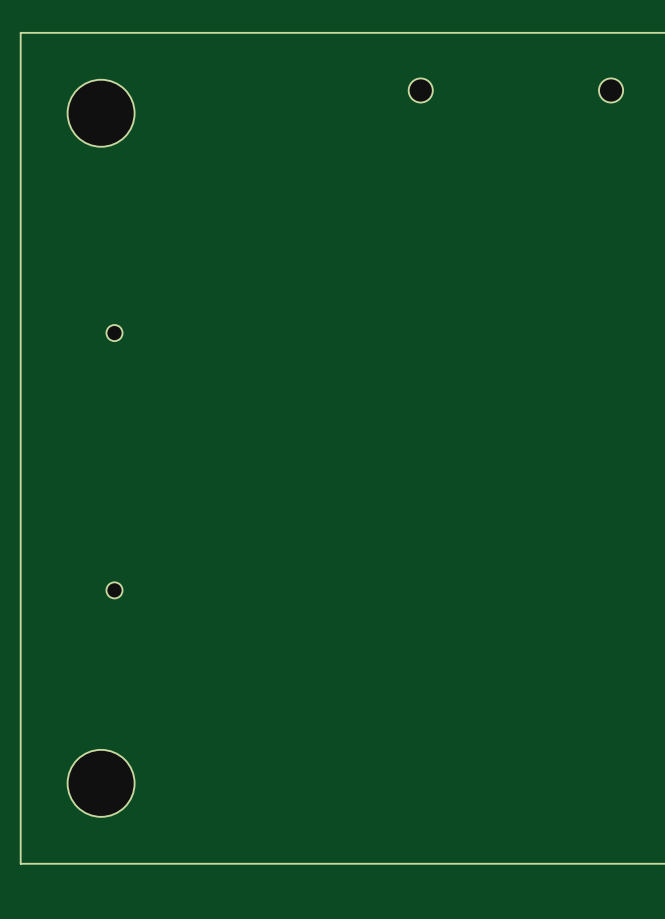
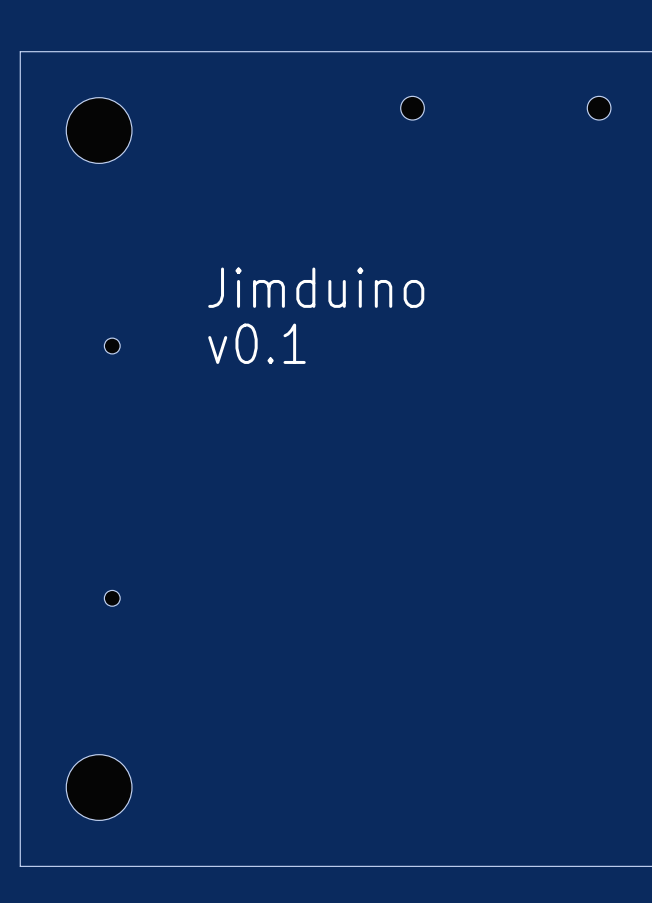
text: none -> Jimduino (316, 287)
text: none -> v0.1 (256, 343)

